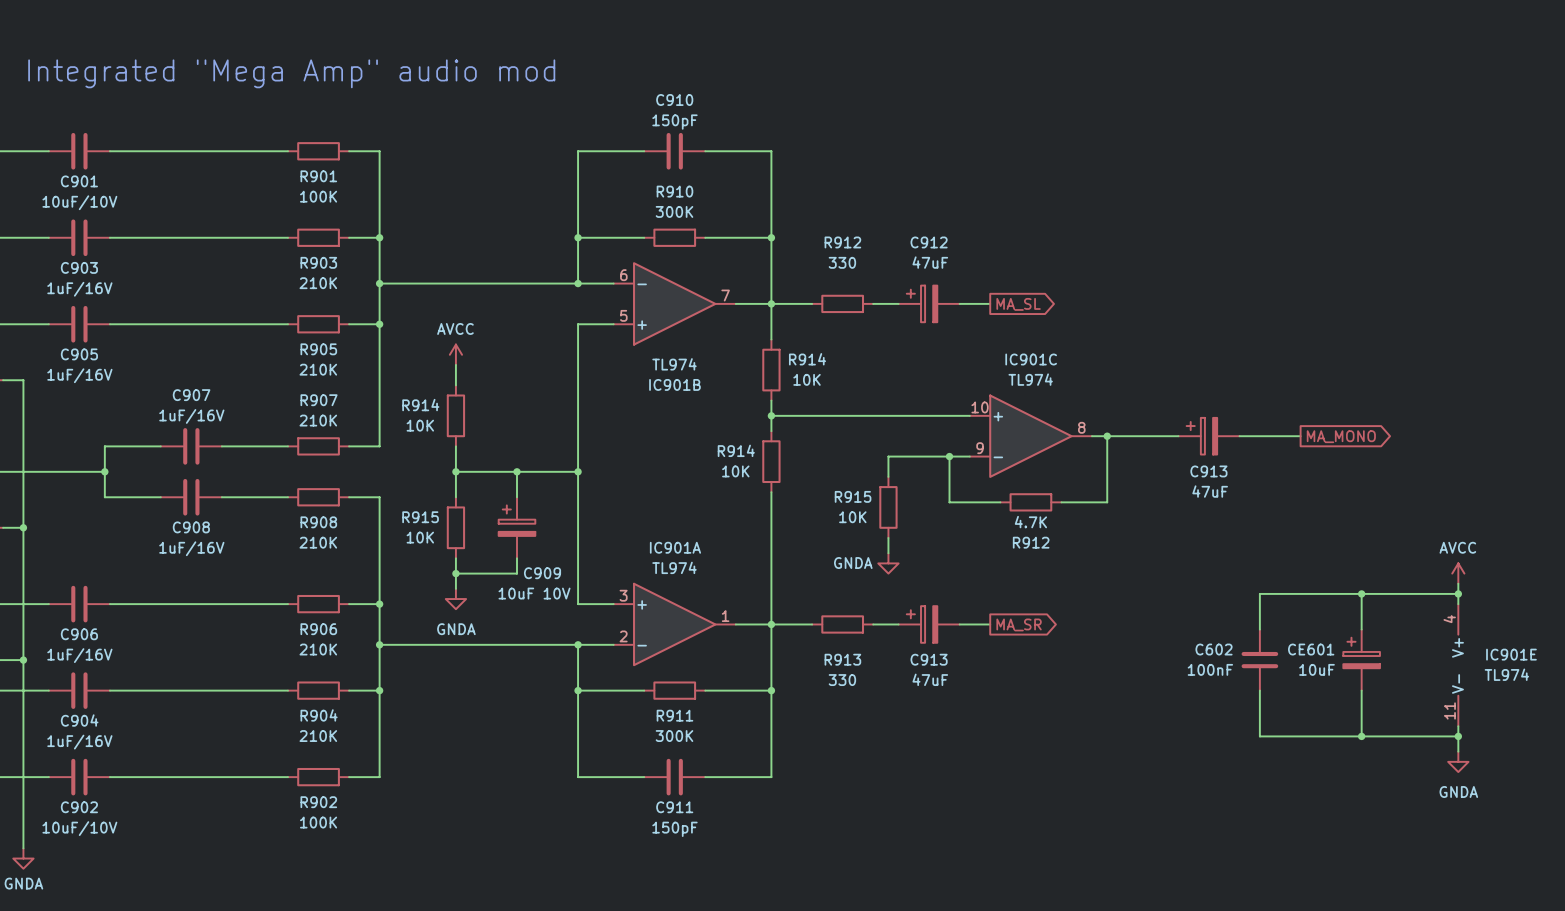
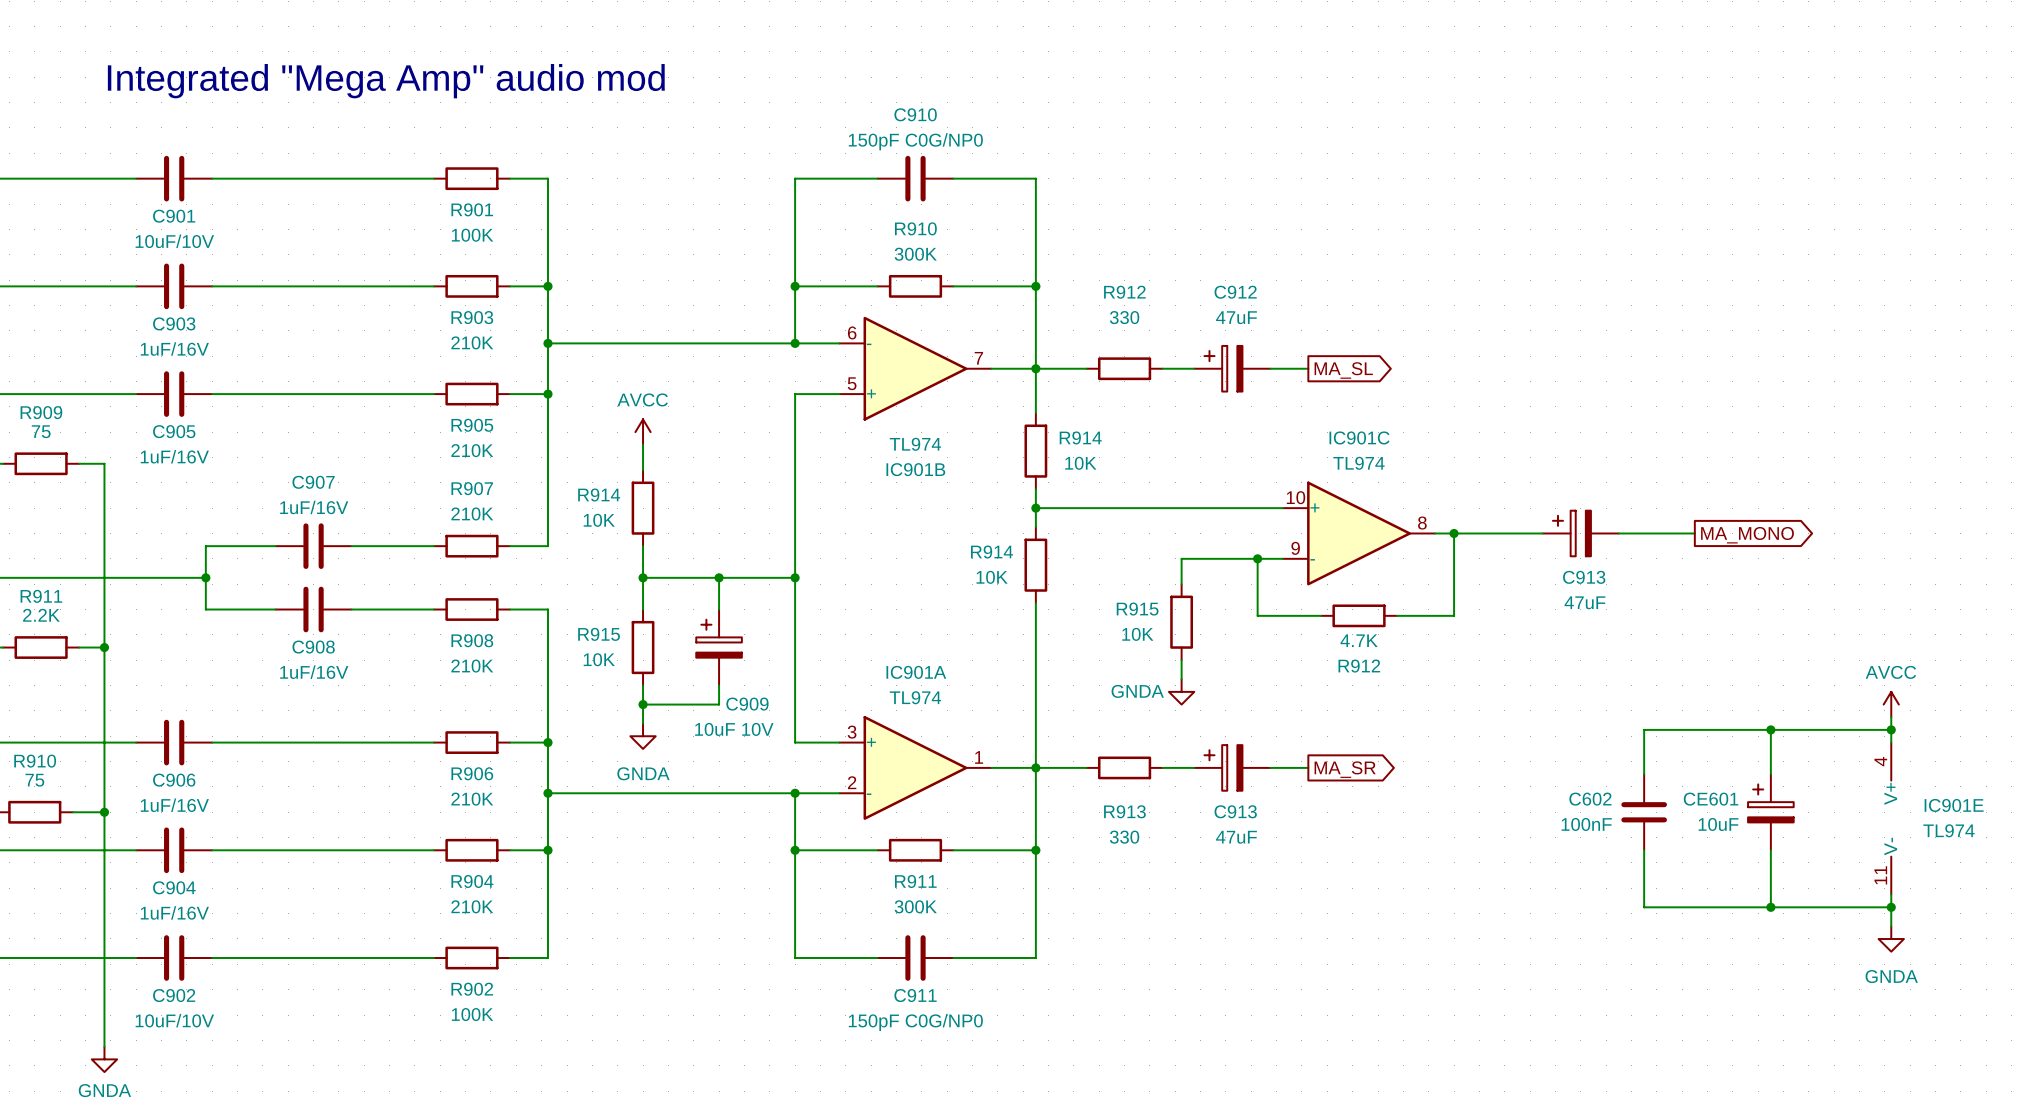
C910 value: 150pF (674, 122) -> 150pF C0G/NP0 (915, 141)
C911 value: 150pF (674, 829) -> 150pF C0G/NP0 (915, 1022)

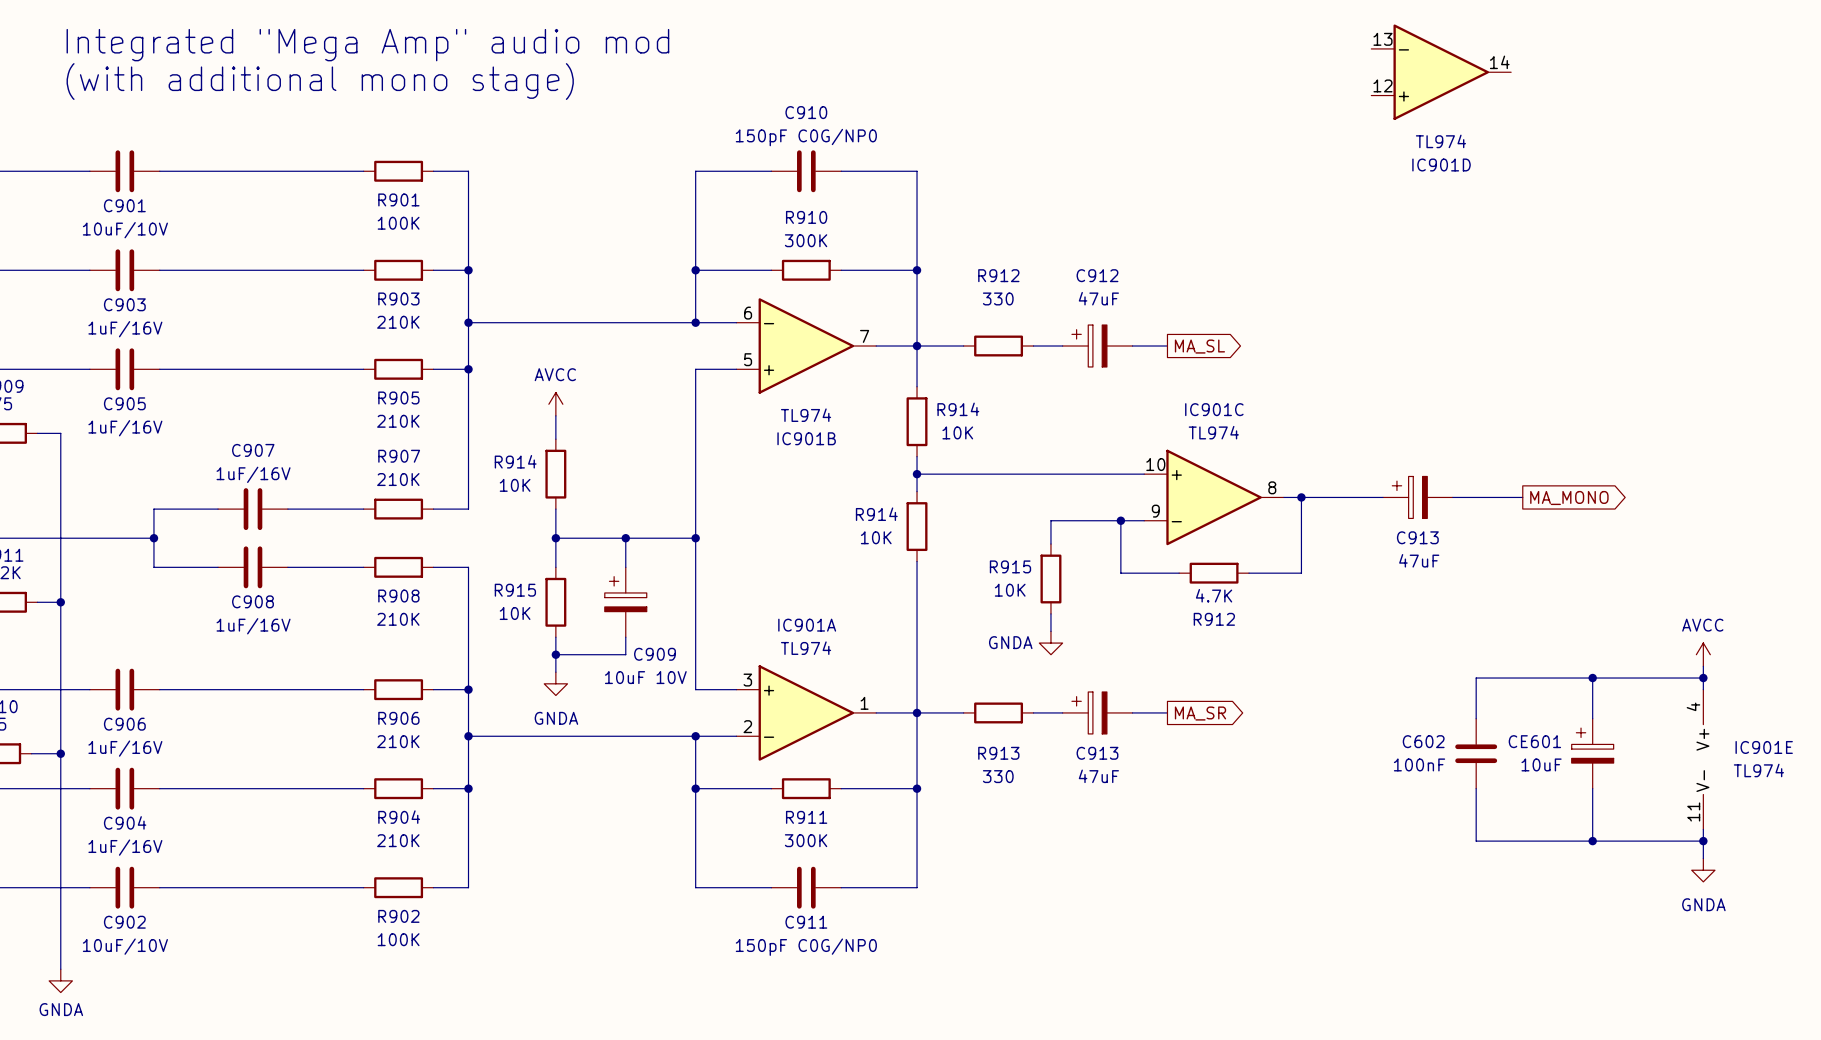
text: none -> Integrated "Mega Amp" audio mod (367, 45)
IC901D: none -> TL974 (1441, 72)
text: Integrated "Mega Amp" audio mod (386, 81) -> (with additional mono stage) (320, 81)

